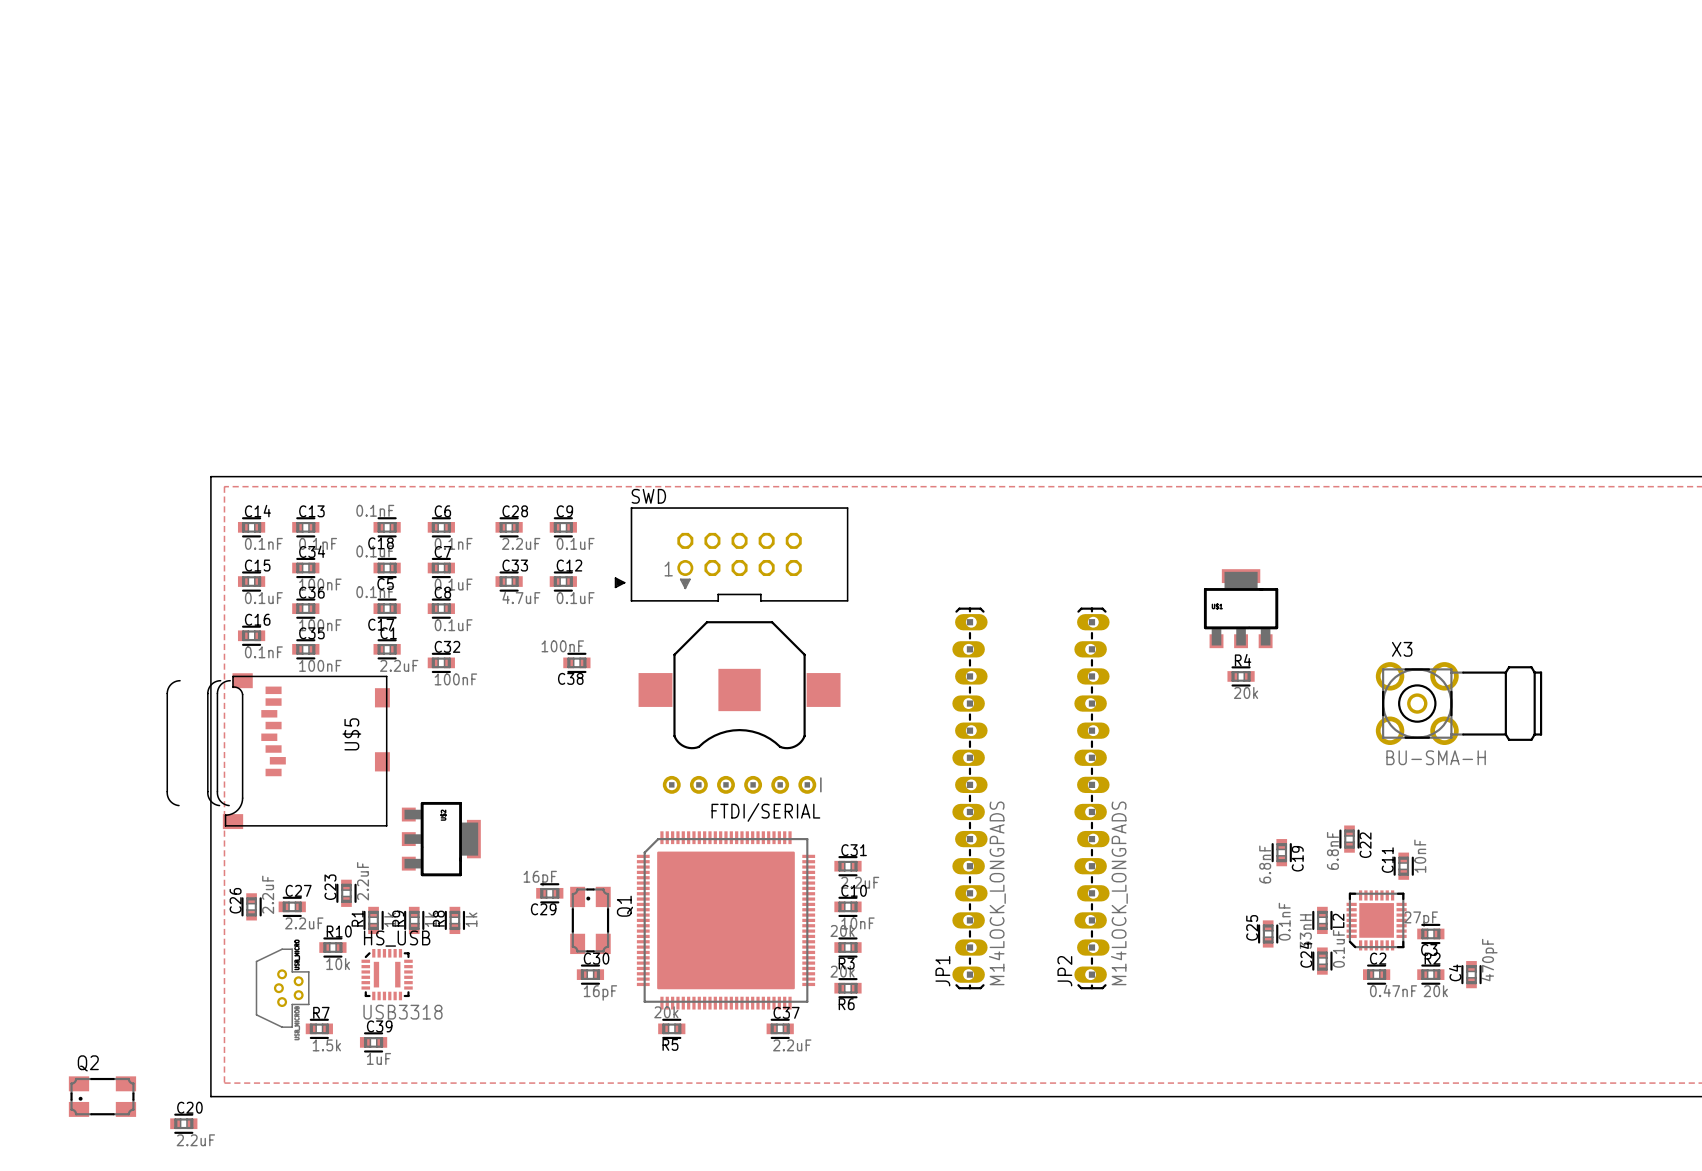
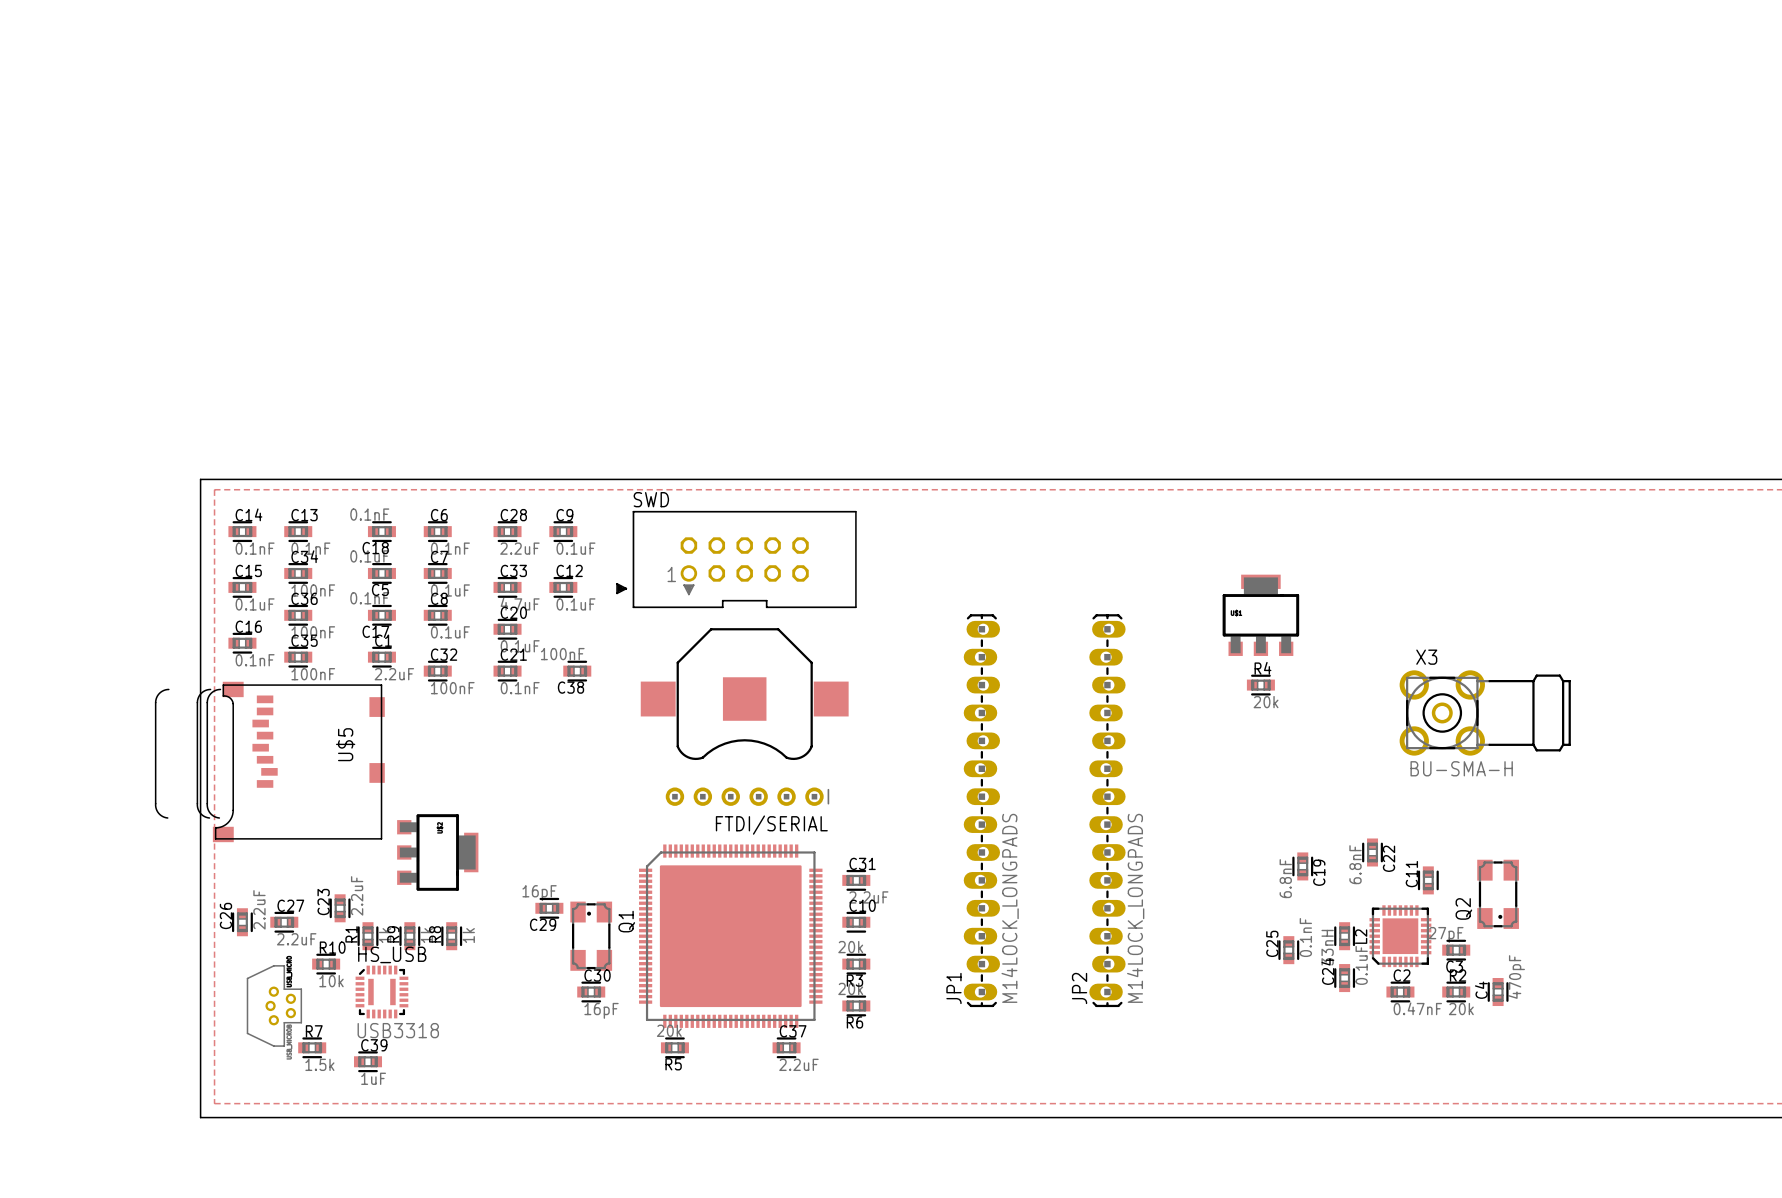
C21: none -> 0.1nF (507, 671)
C11 value: 10nF (1420, 856) -> none
C10 value: 10nF (857, 923) -> none
Q2 rotation: 0° (102, 1096) -> 90° counterclockwise (1498, 894)
Q2 position: (102, 1096) -> (1498, 894)
C20 position: (183, 1123) -> (507, 629)
C20 value: 2.2uF (195, 1140) -> 0.1uF (520, 646)

